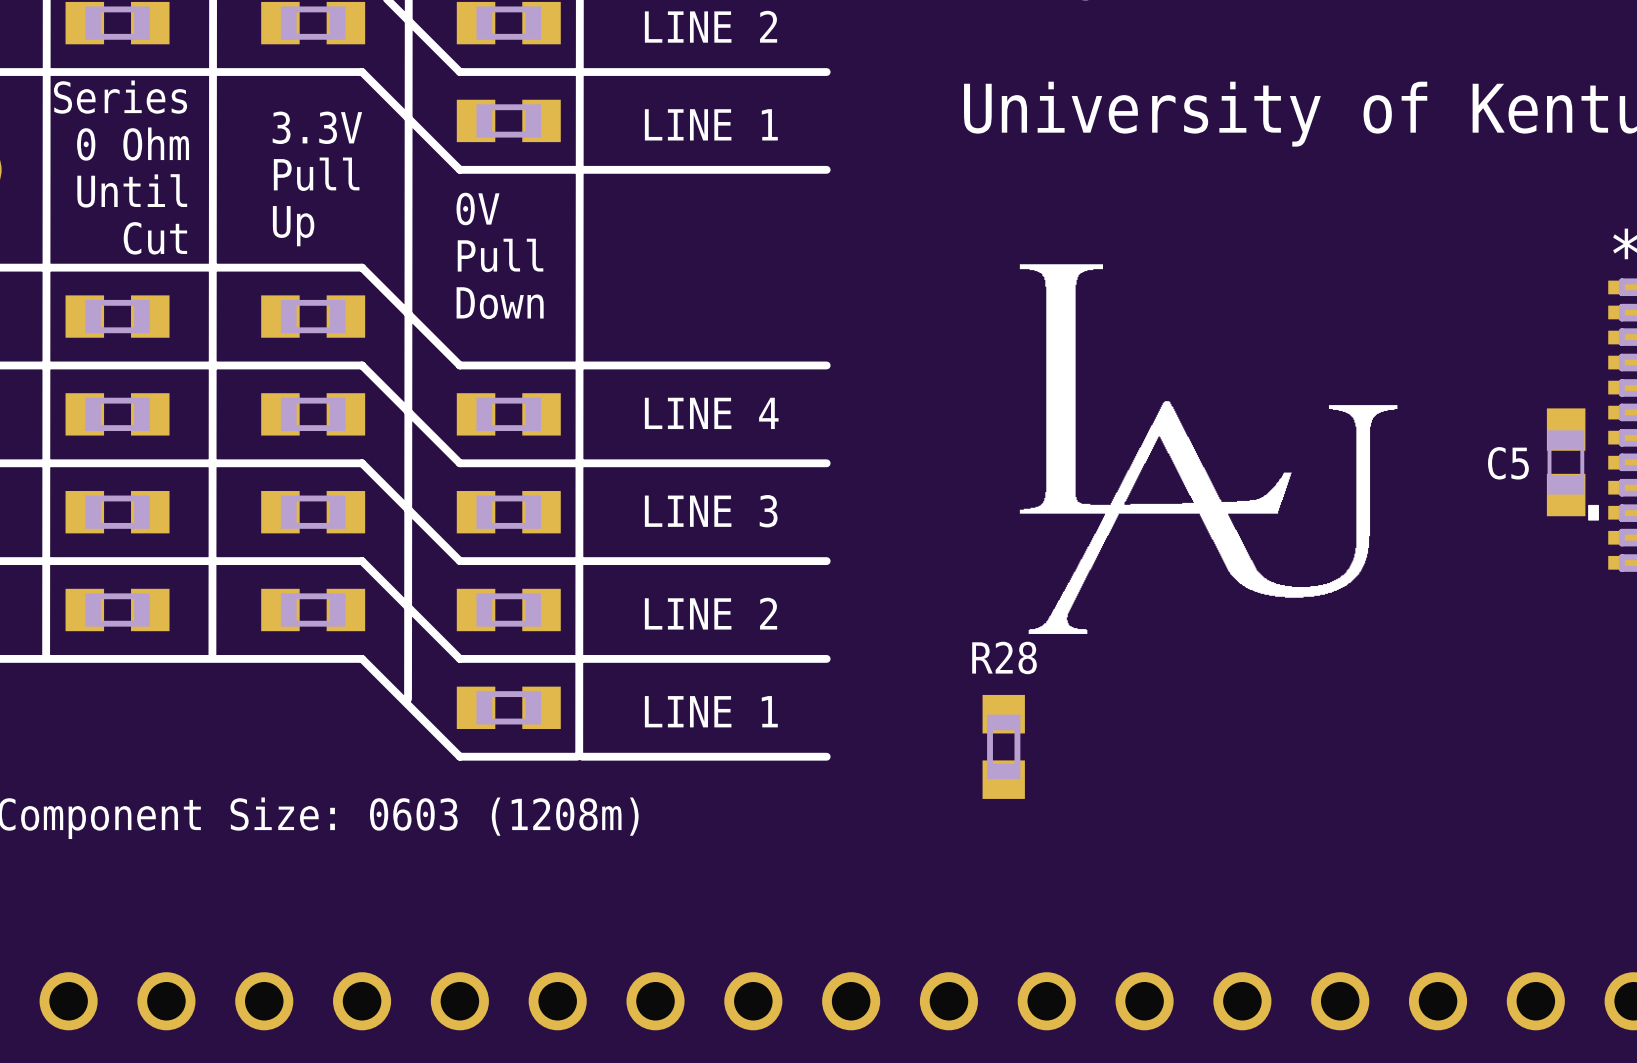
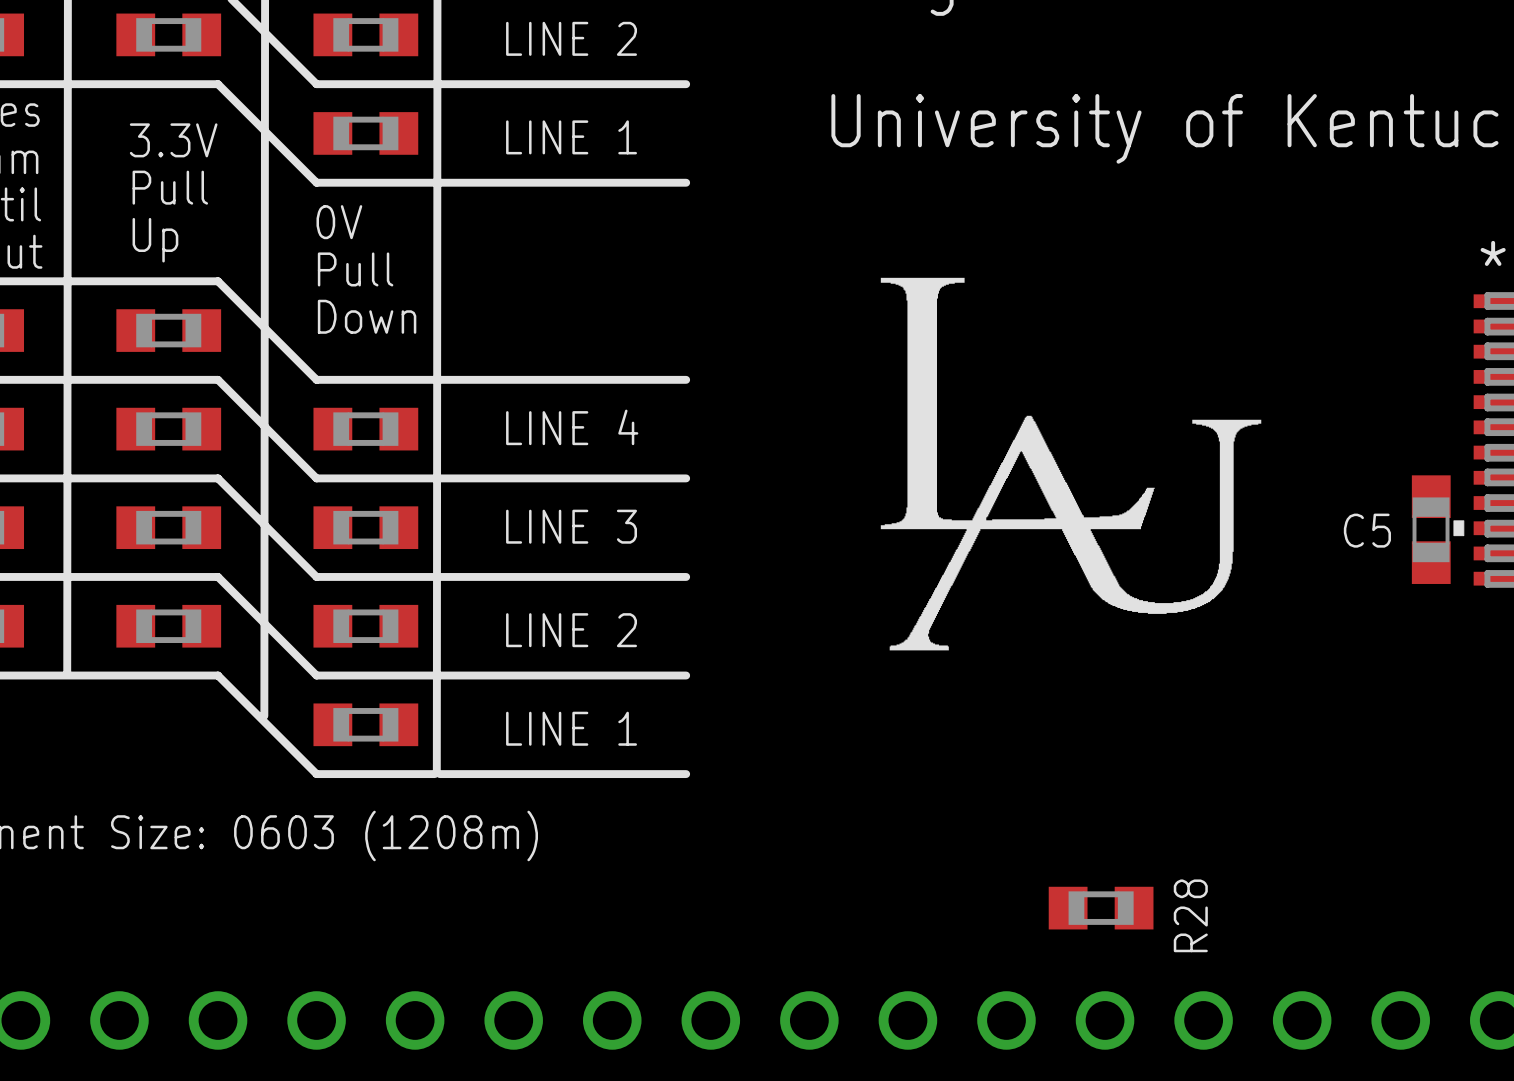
C5 position: (1566, 462) -> (1431, 529)
R28 rotation: 0° (1003, 746) -> 90° clockwise (1101, 908)
R28 position: (1003, 746) -> (1101, 908)

